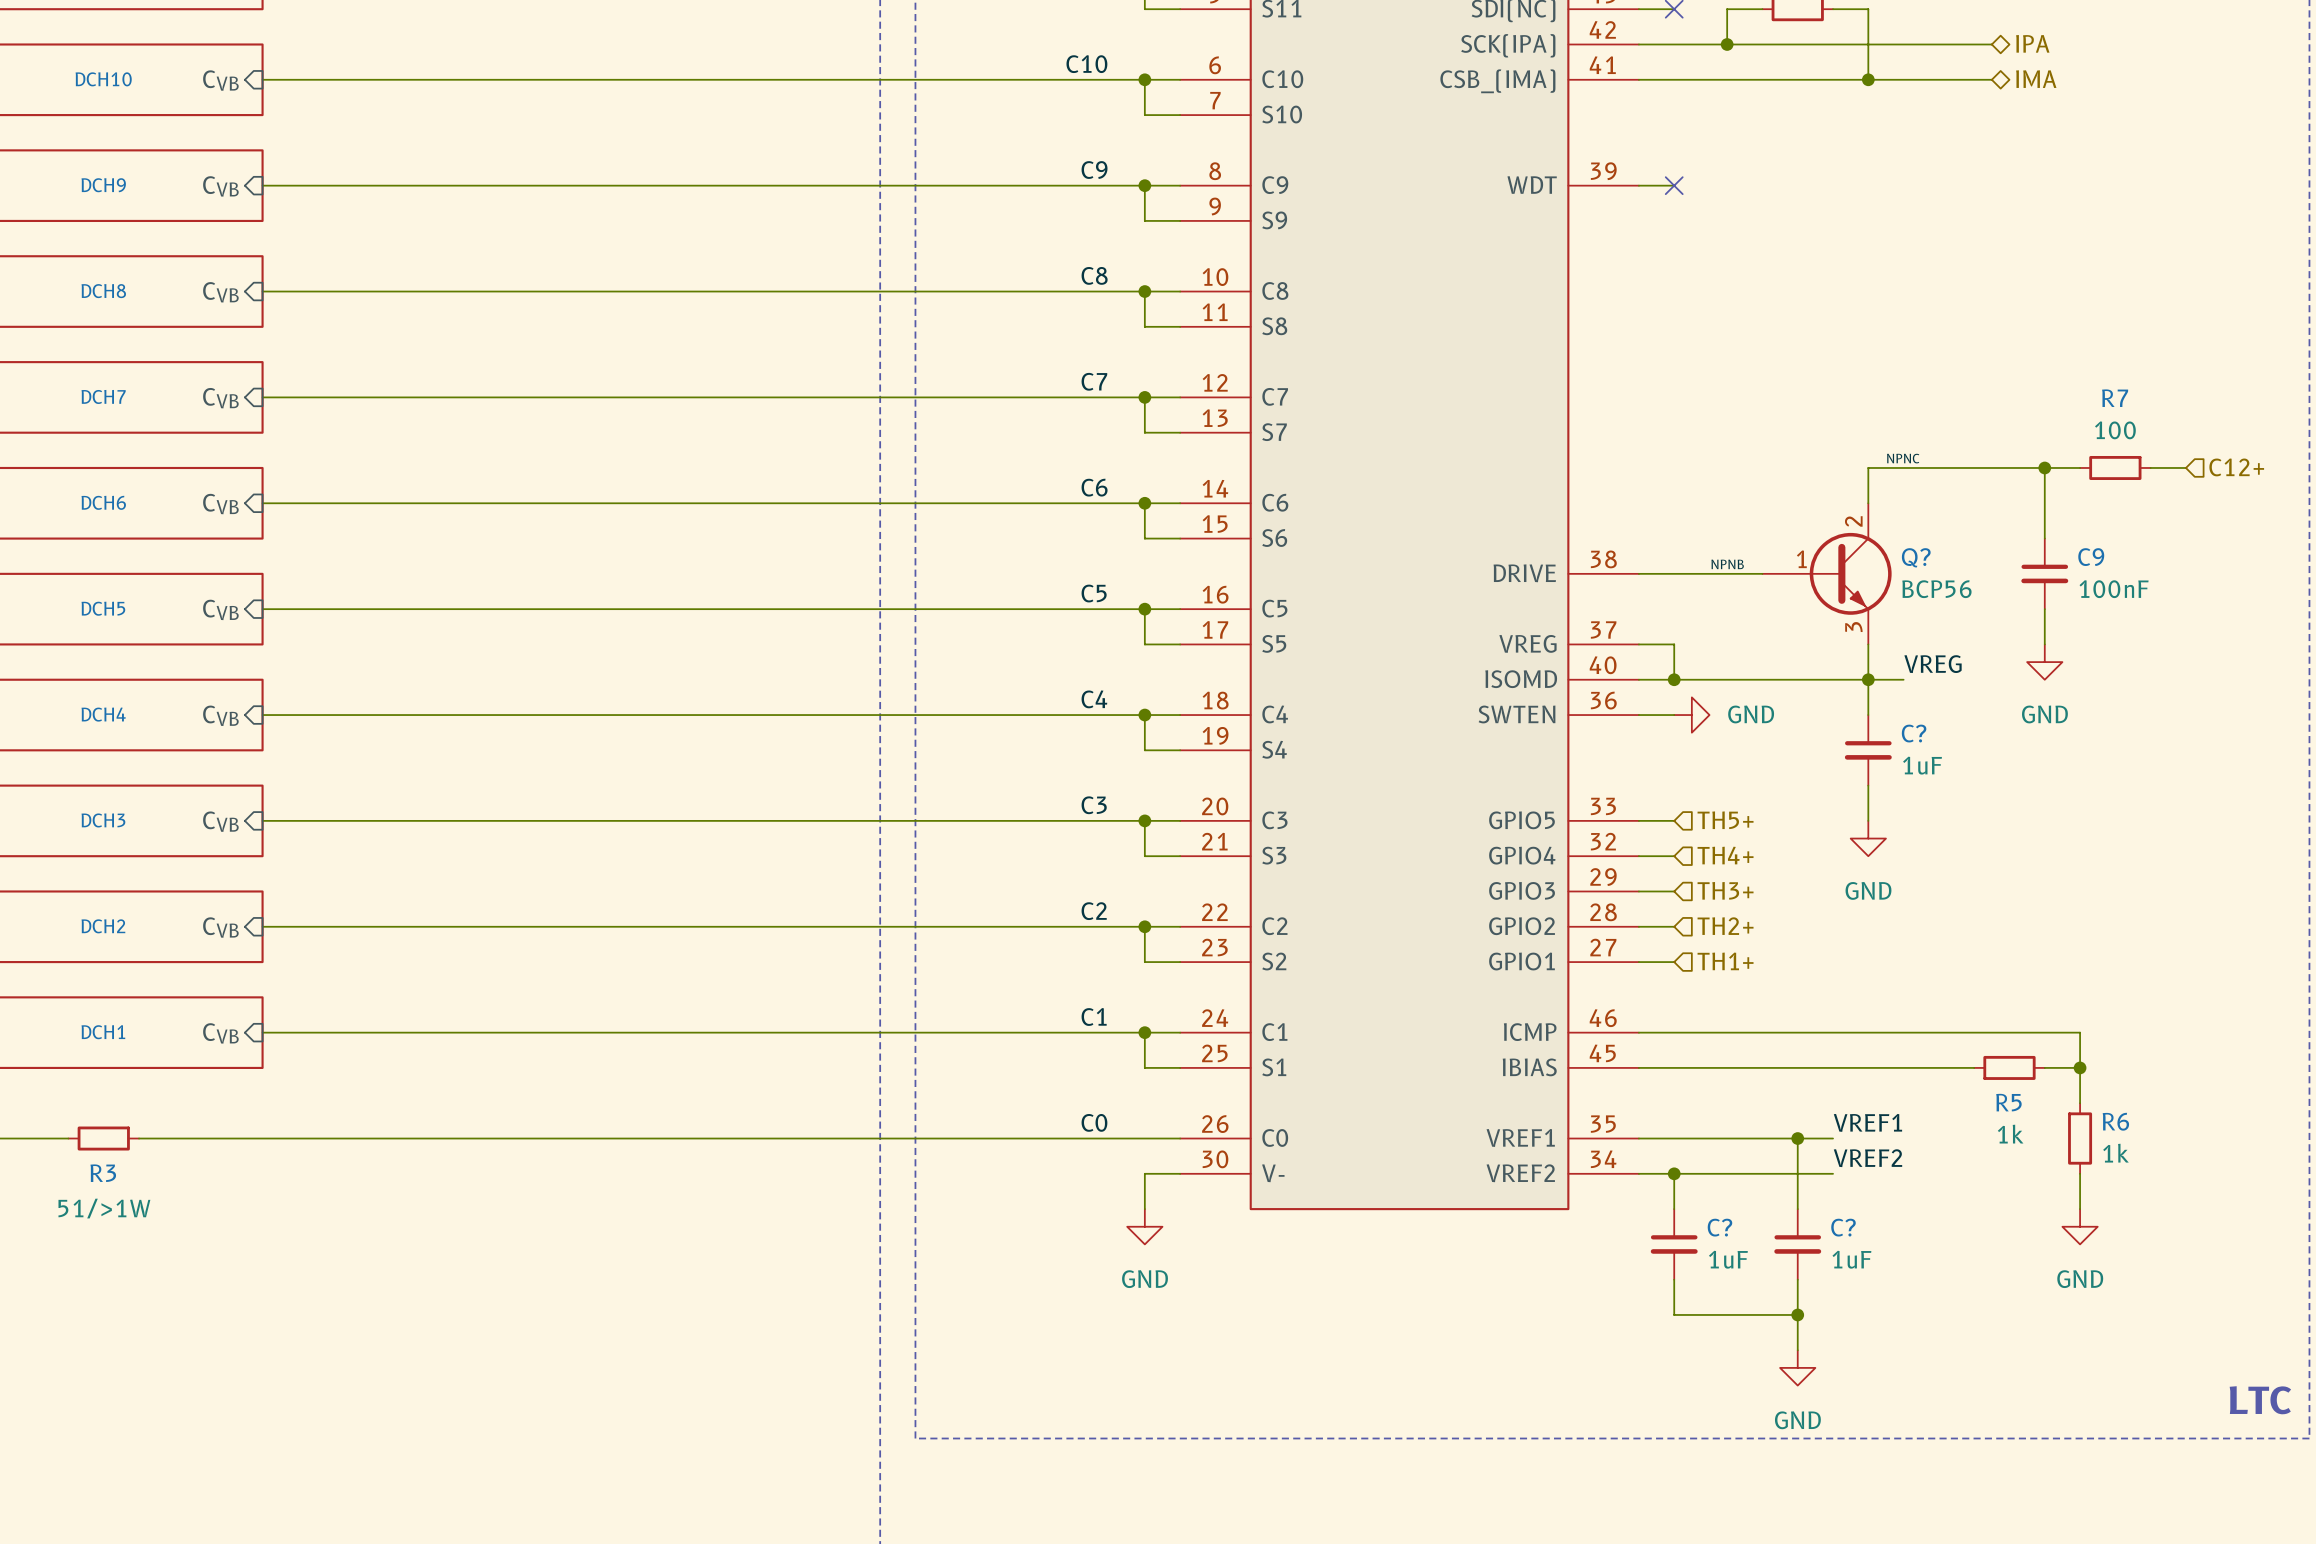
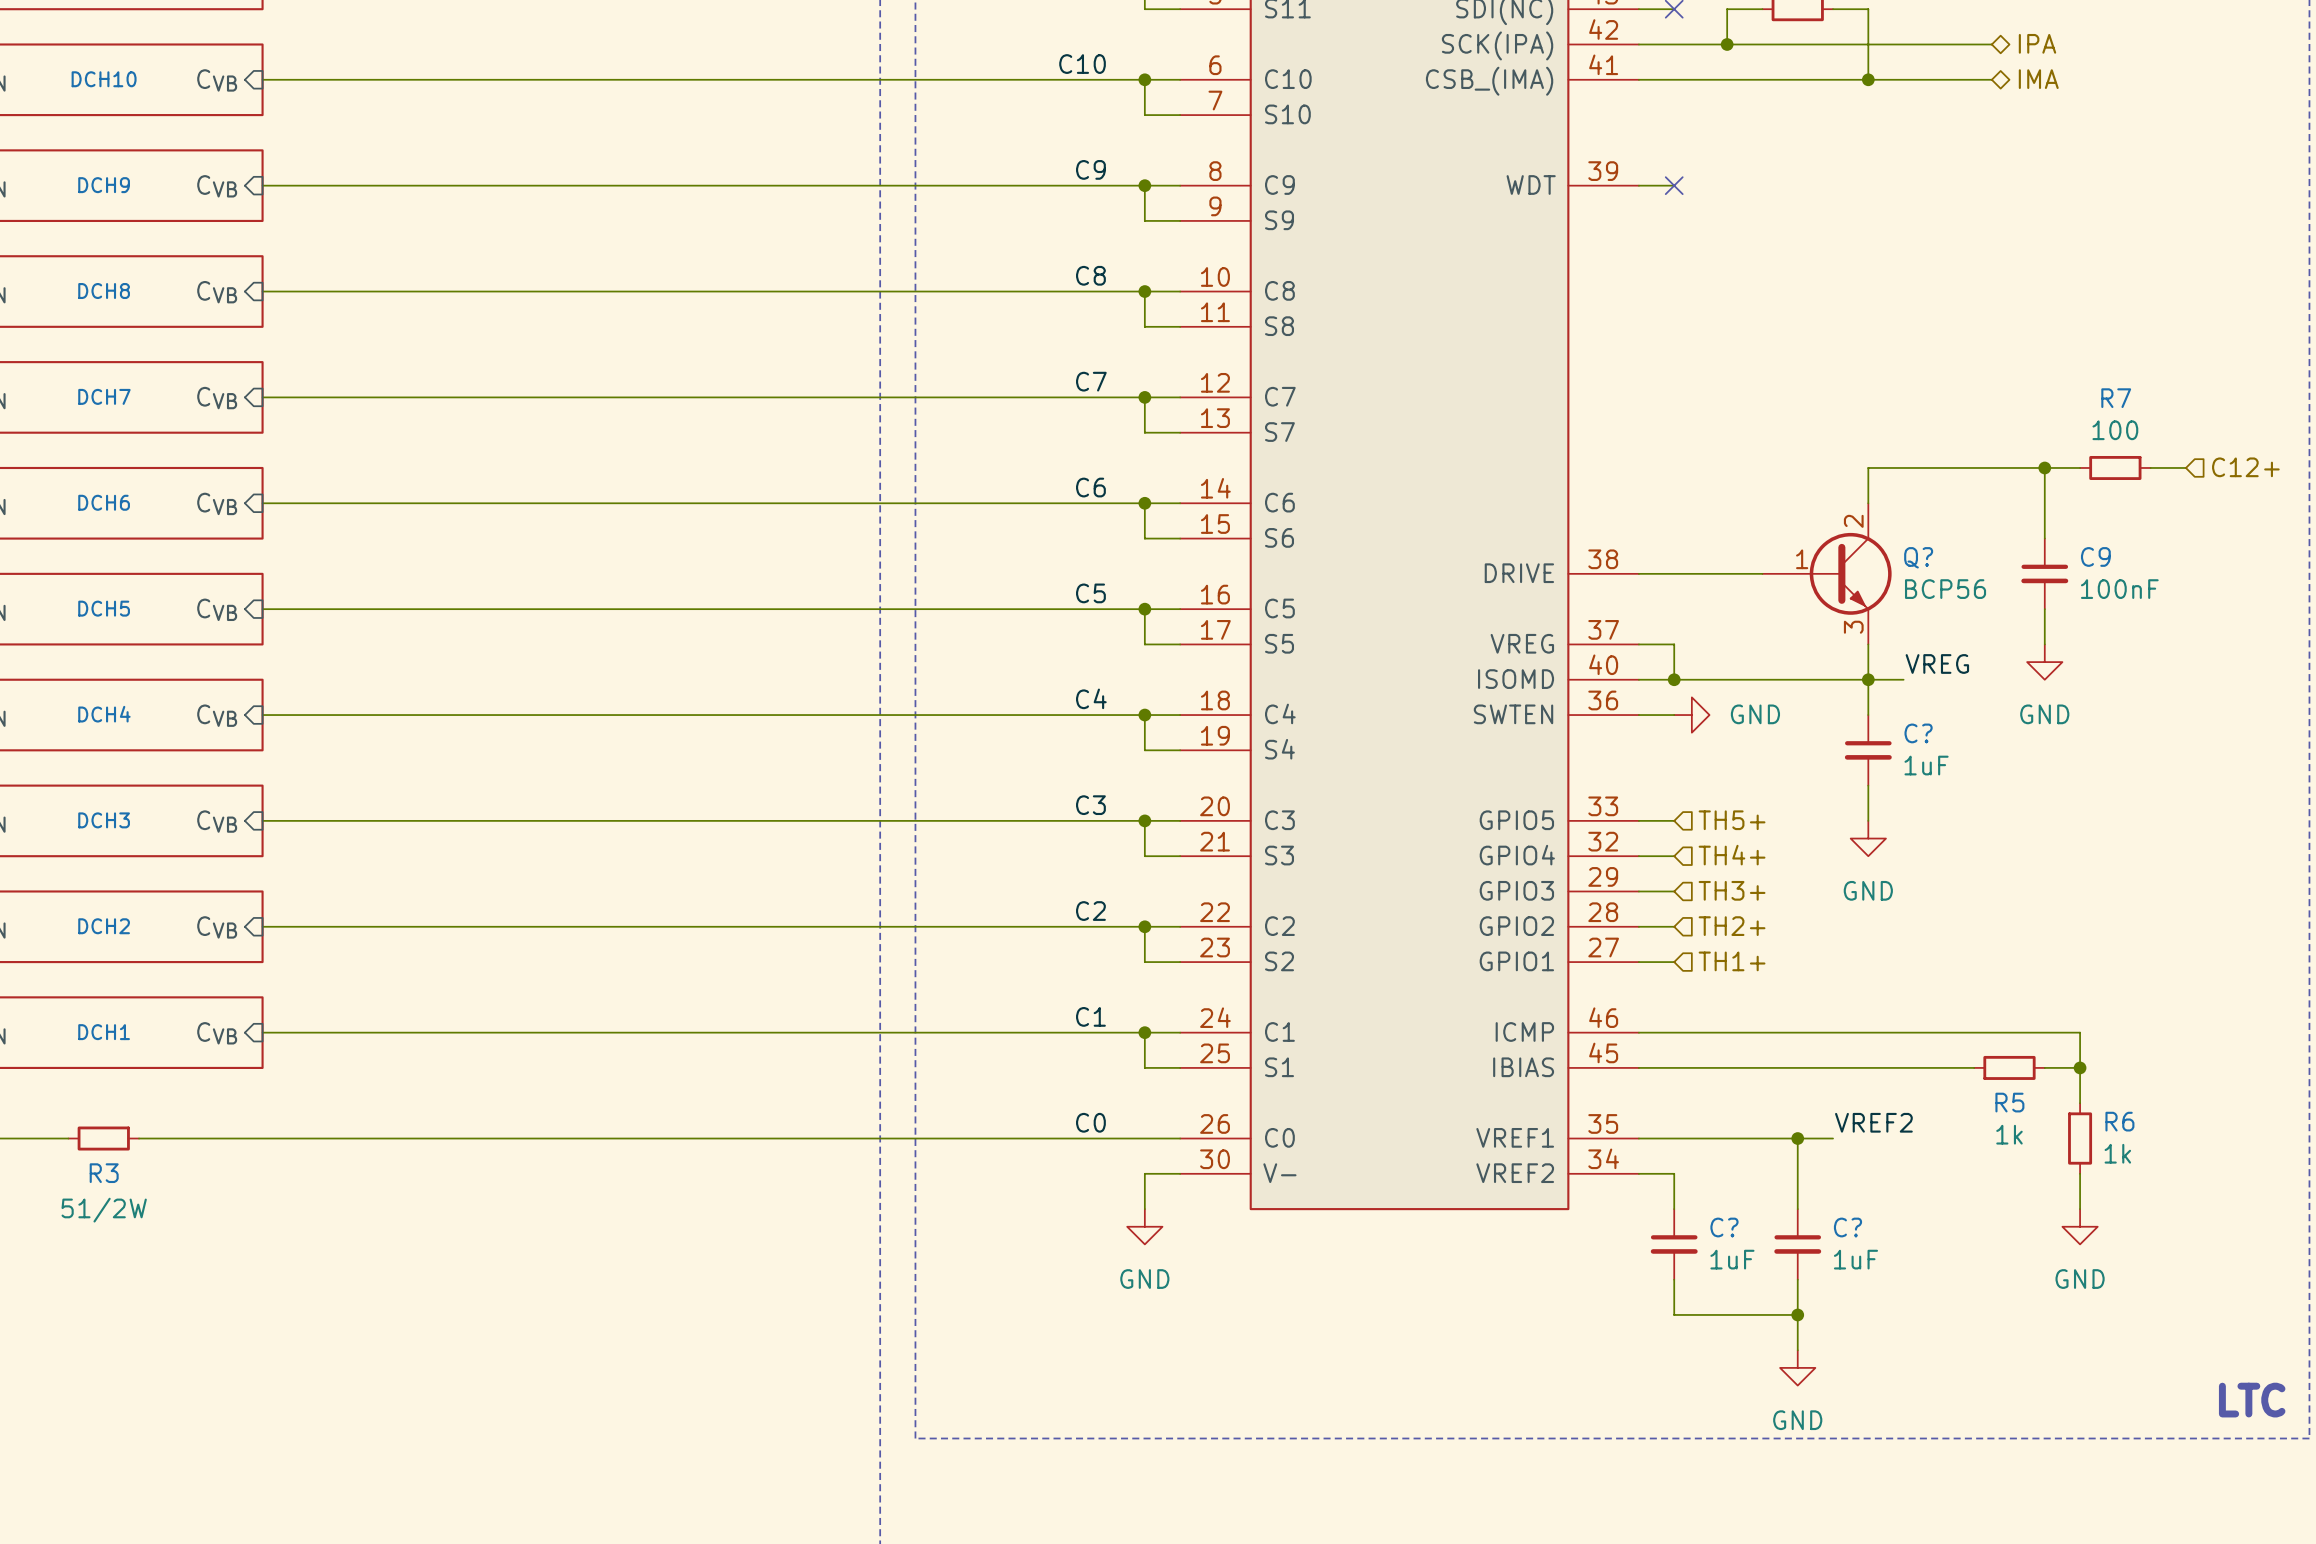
label: NPNC (1903, 458) -> none
label: NPNB (1727, 564) -> none
label: VREF1 (1867, 1122) -> VREF2 (1873, 1122)
label: VREF2 (1867, 1158) -> none
wire: (1674, 1173) (1833, 1173) -> none
junction: (1674, 1173) -> none
R3 value: 51/>1W (104, 1208) -> 51/2W (104, 1210)

